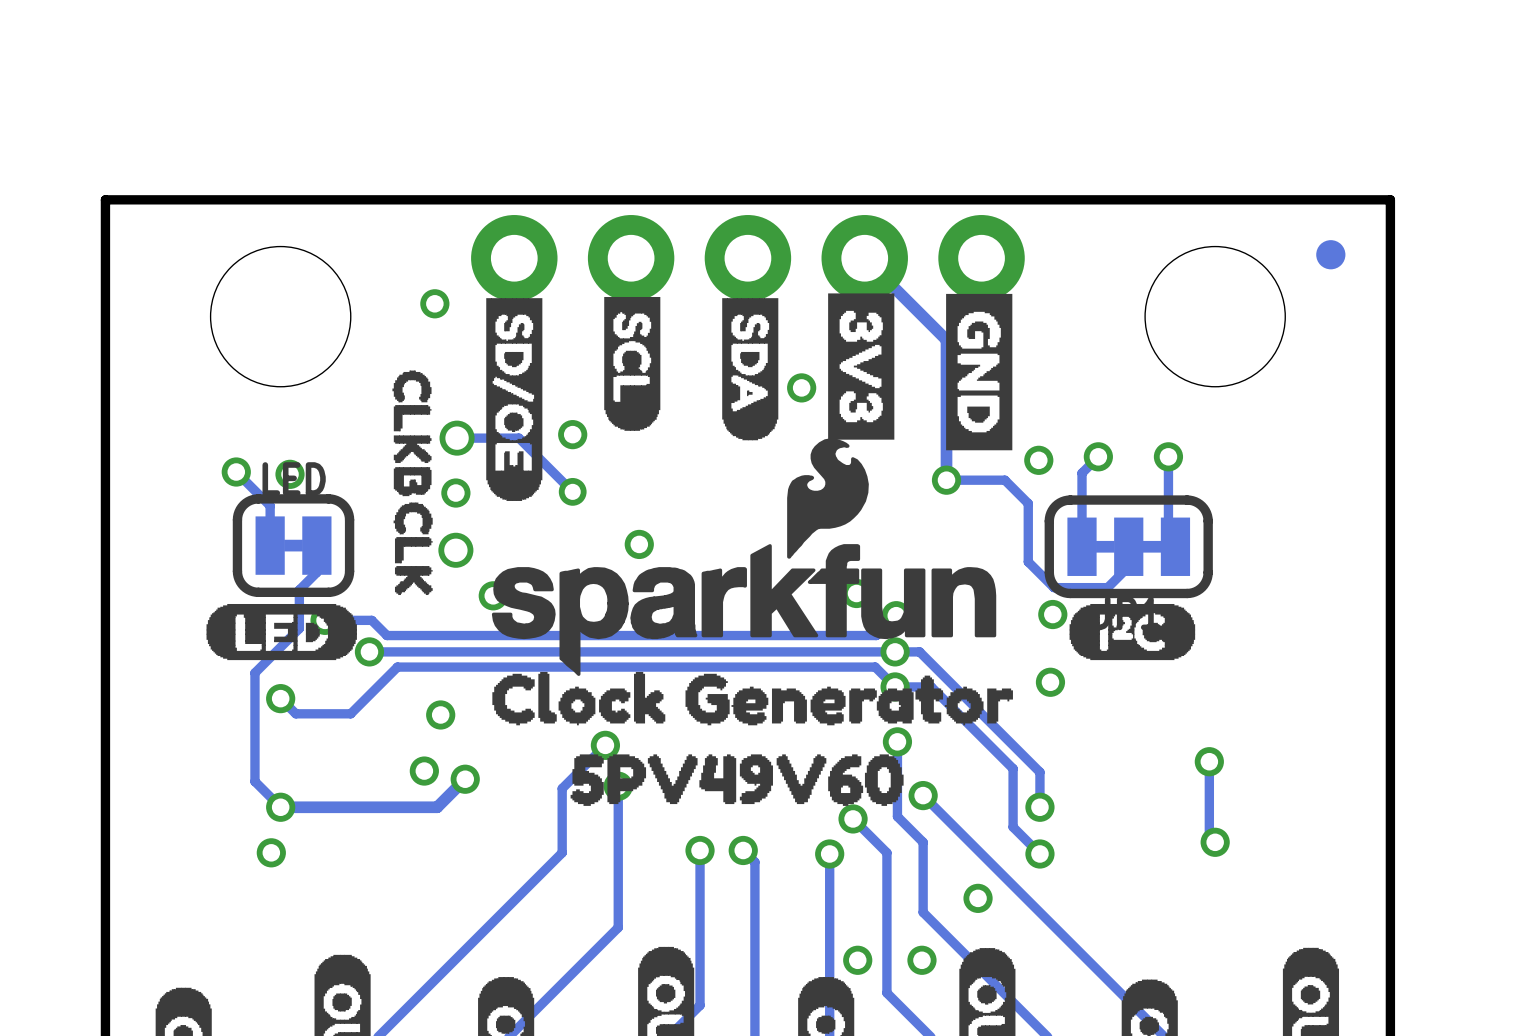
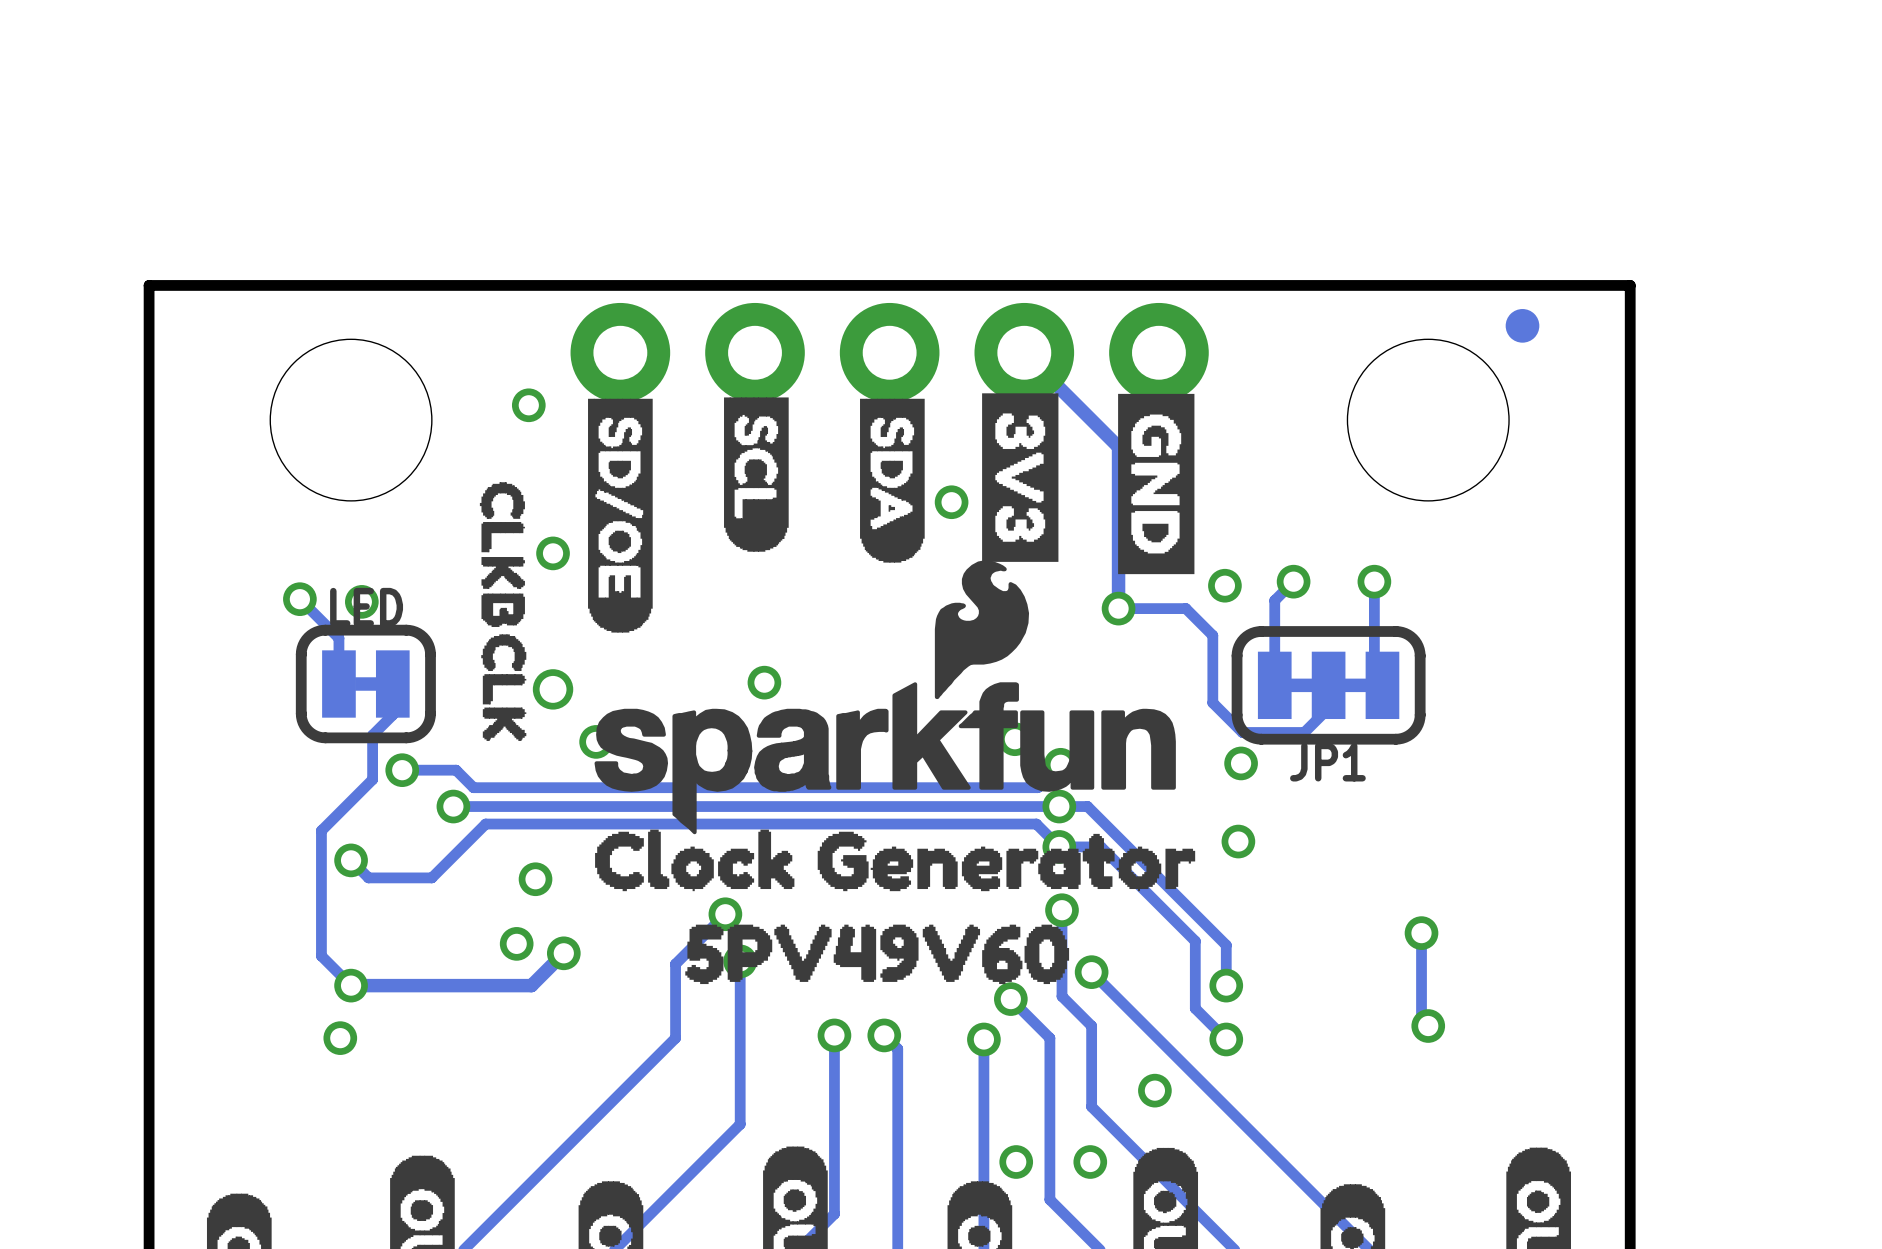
part position: (1330, 254) -> (1522, 325)
part footprint: [439, 420, 475, 456] -> [536, 536, 570, 571]
via: (572, 434) -> none
track: (457, 438) (518, 438) (572, 491) -> none
via: (572, 491) -> none
via: (455, 493) -> none
drawing: [206, 603, 357, 661] -> none
drawing: [1069, 603, 1196, 661] -> none

